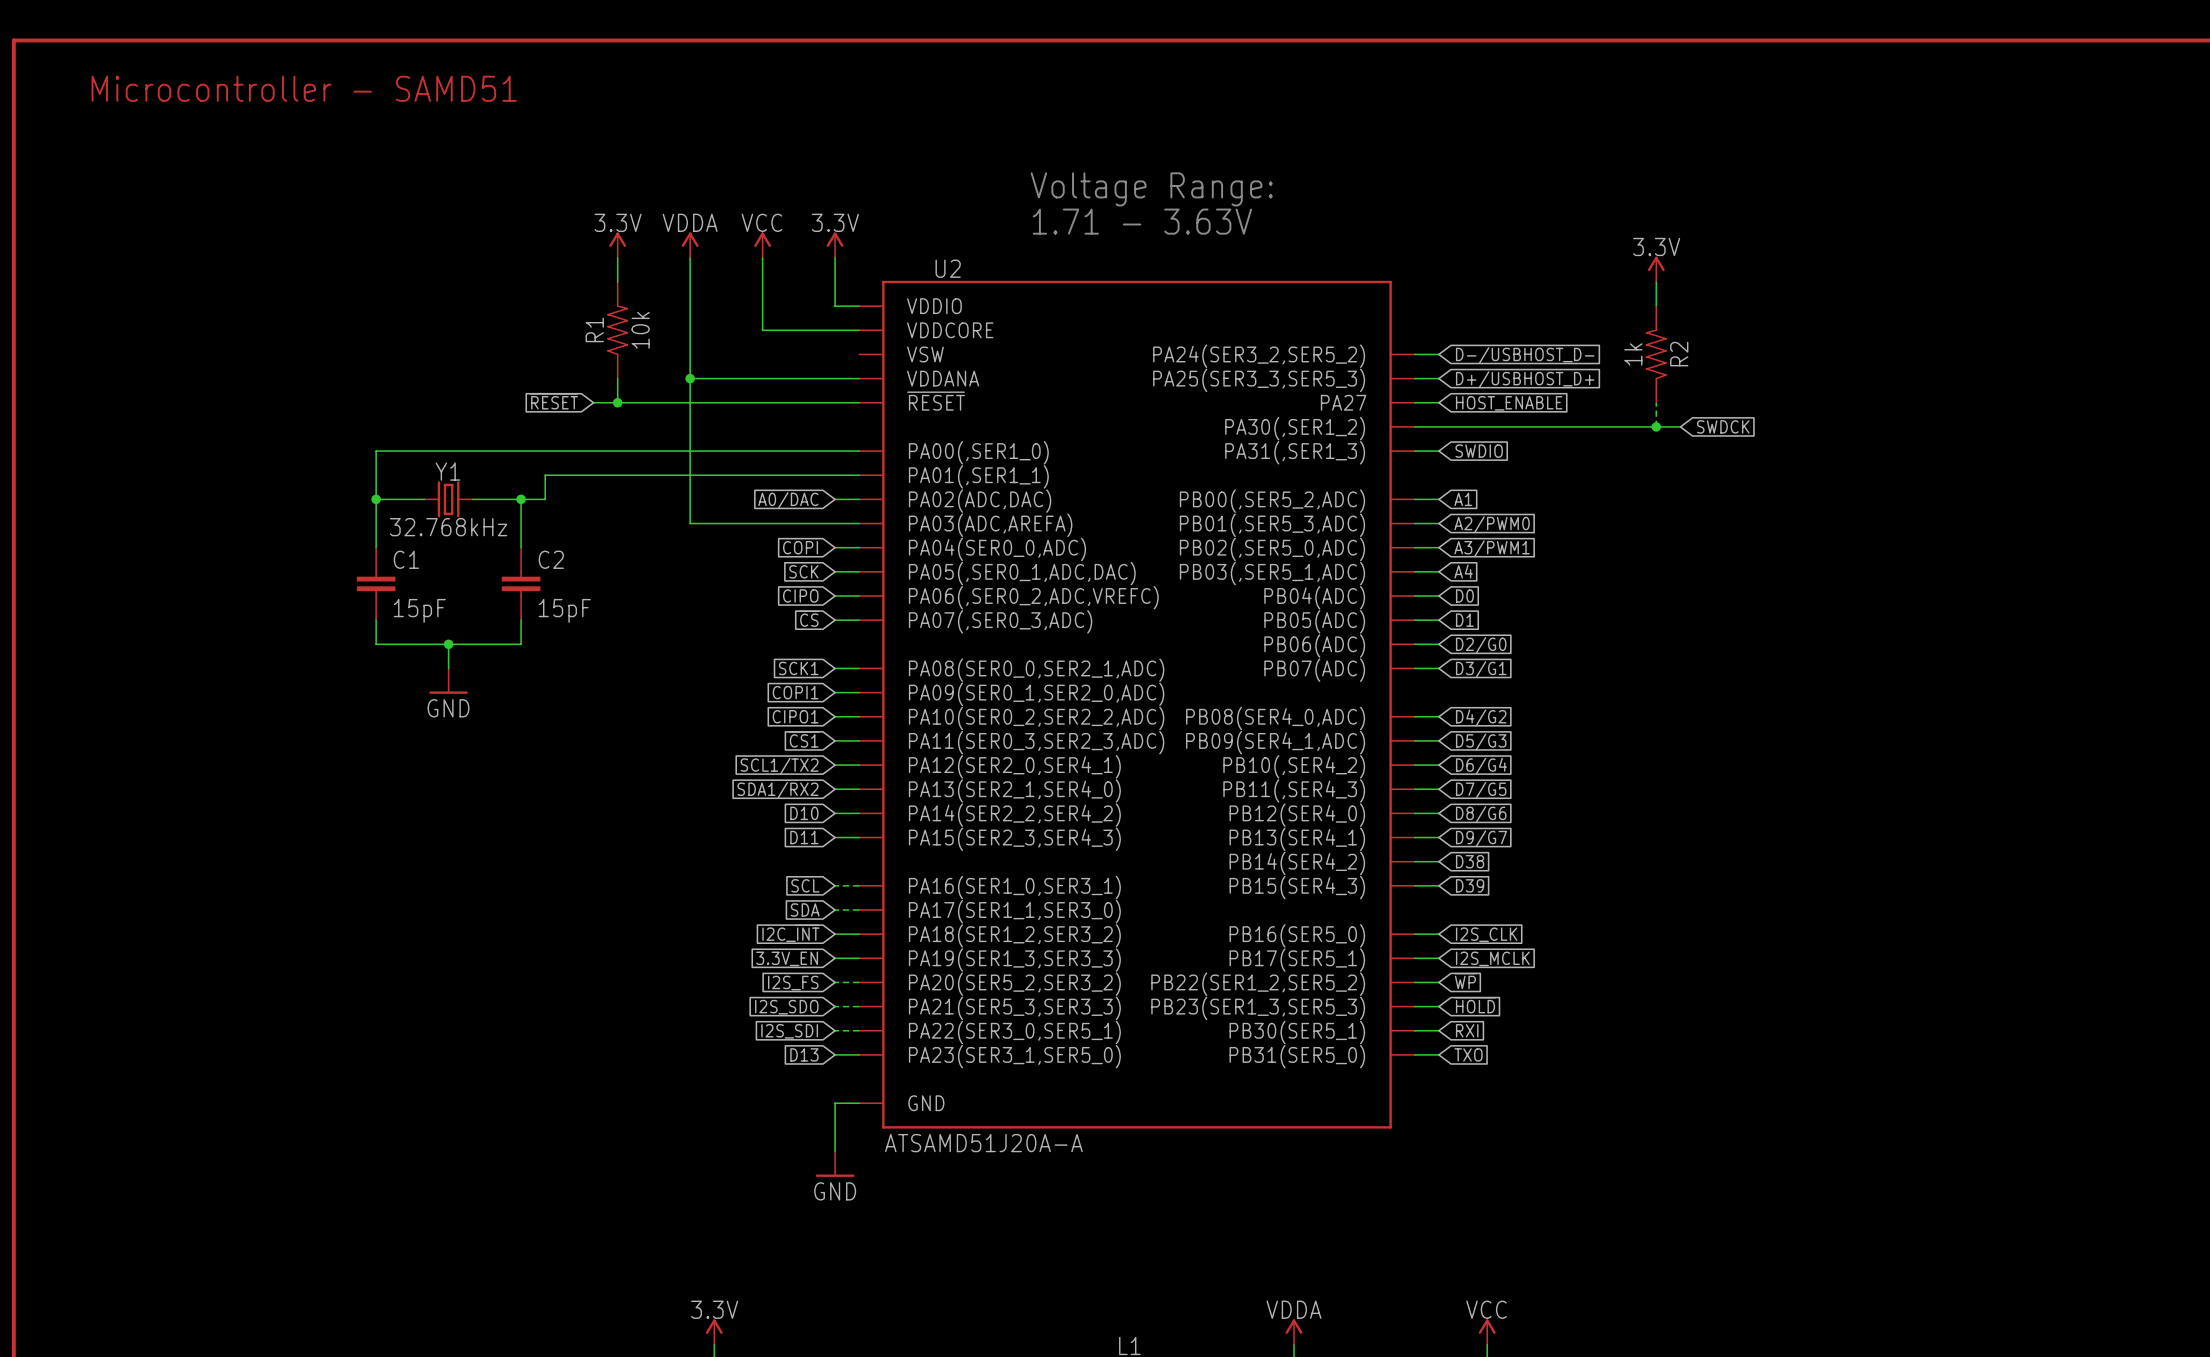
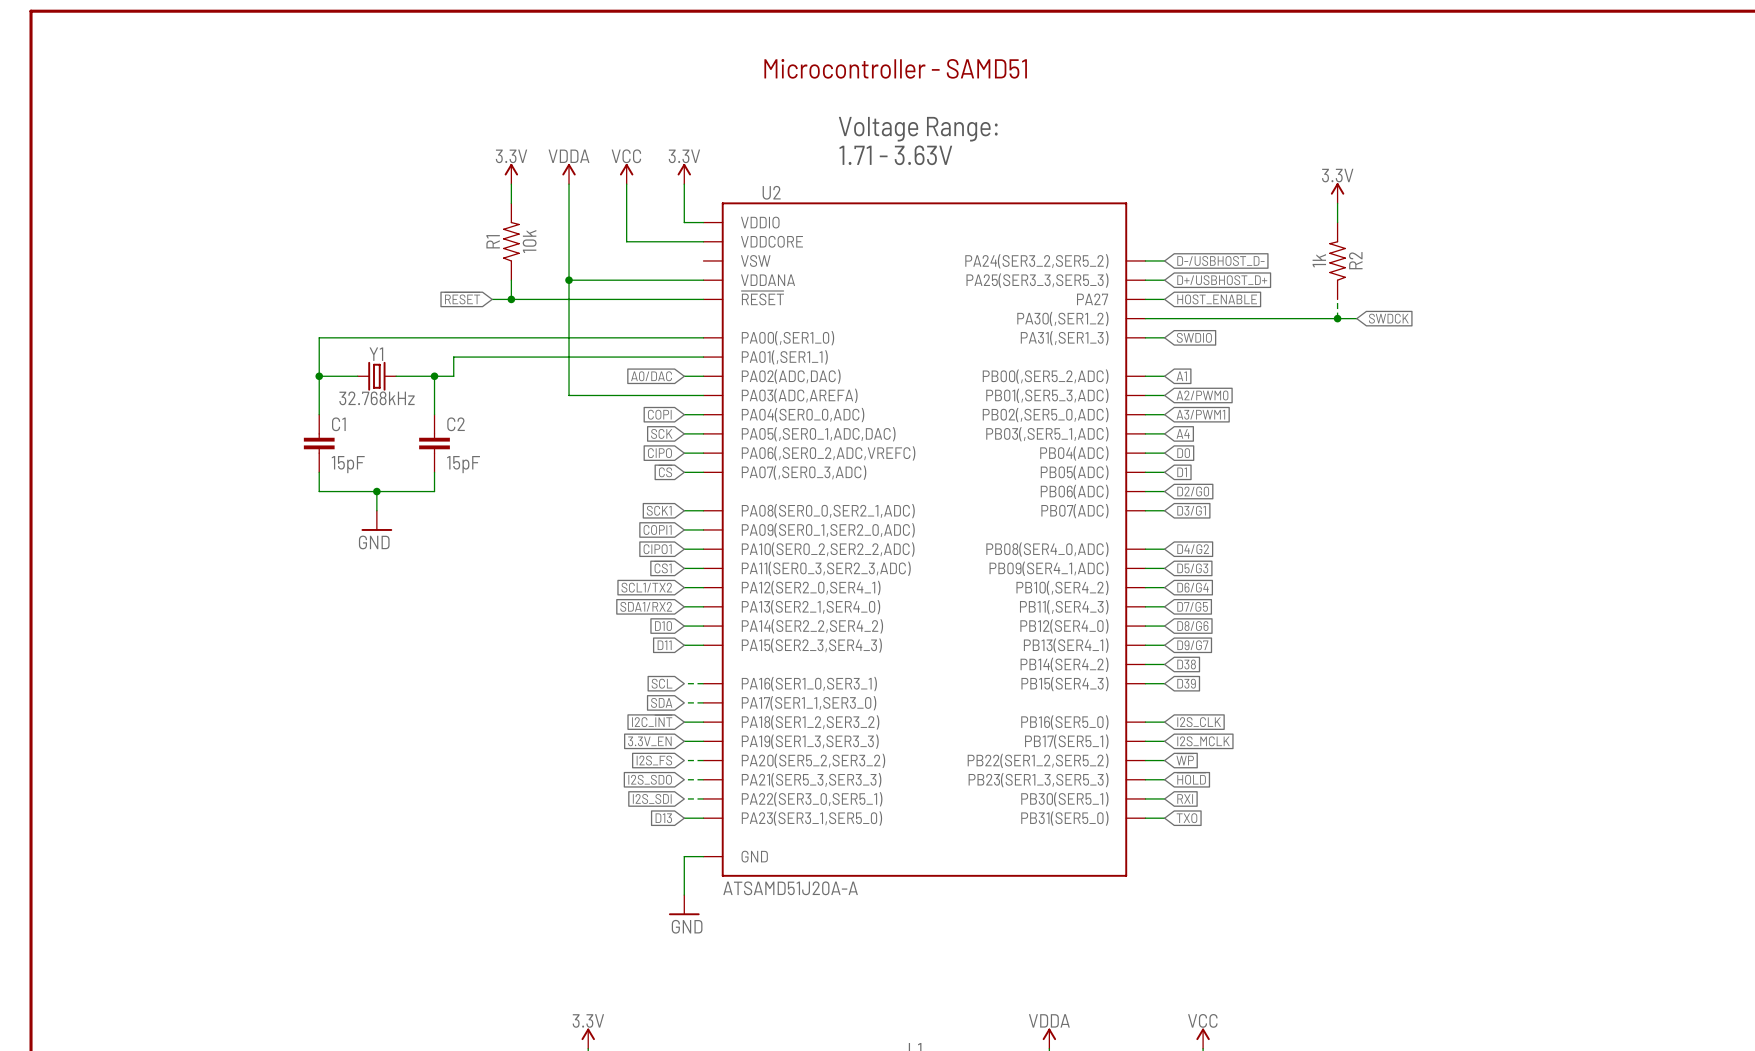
text: Microcontroller - SAMD51 (304, 88) -> none
text: none -> Microcontroller - SAMD51 (895, 68)

